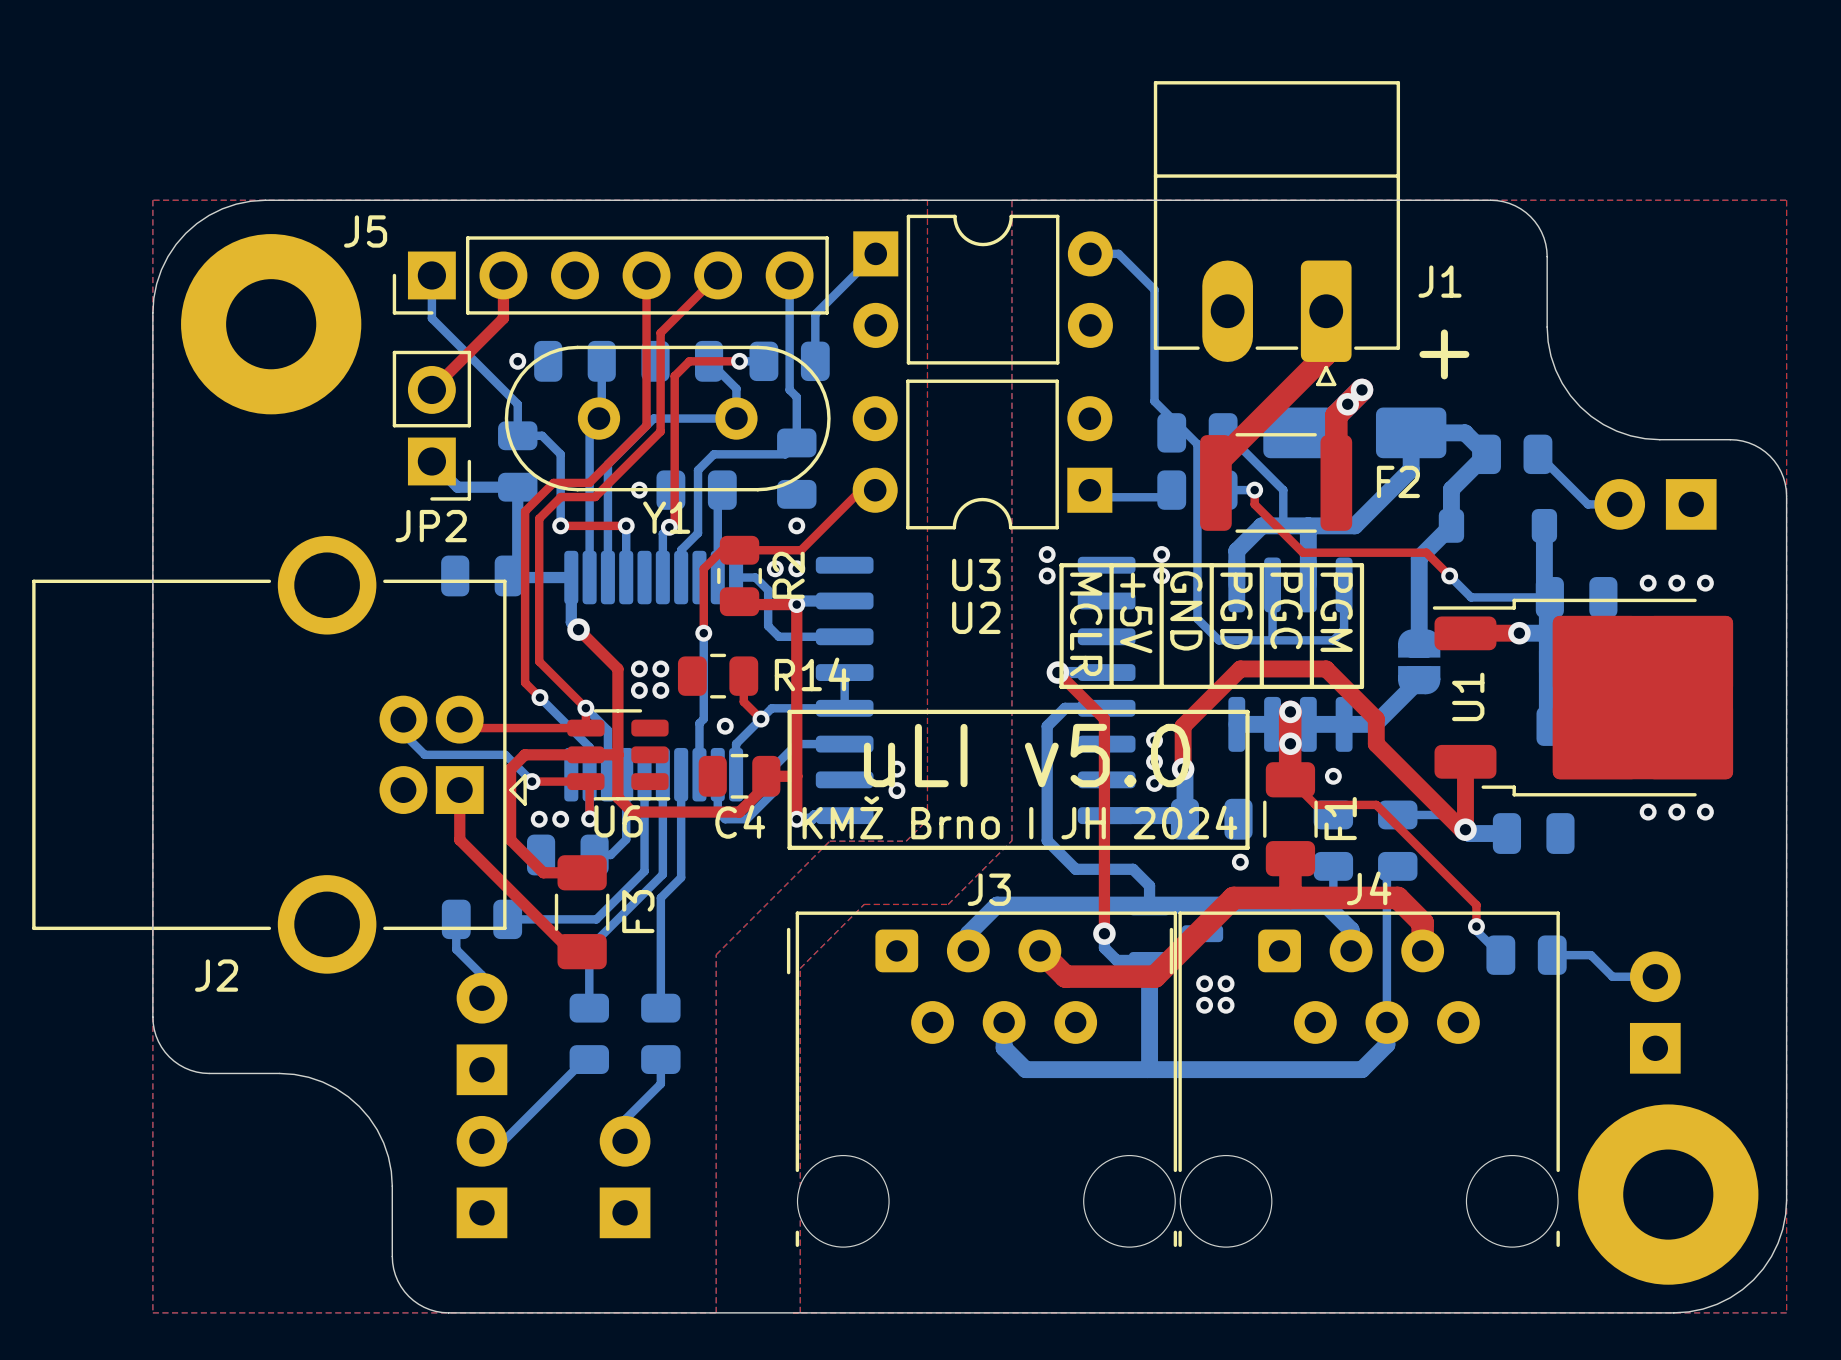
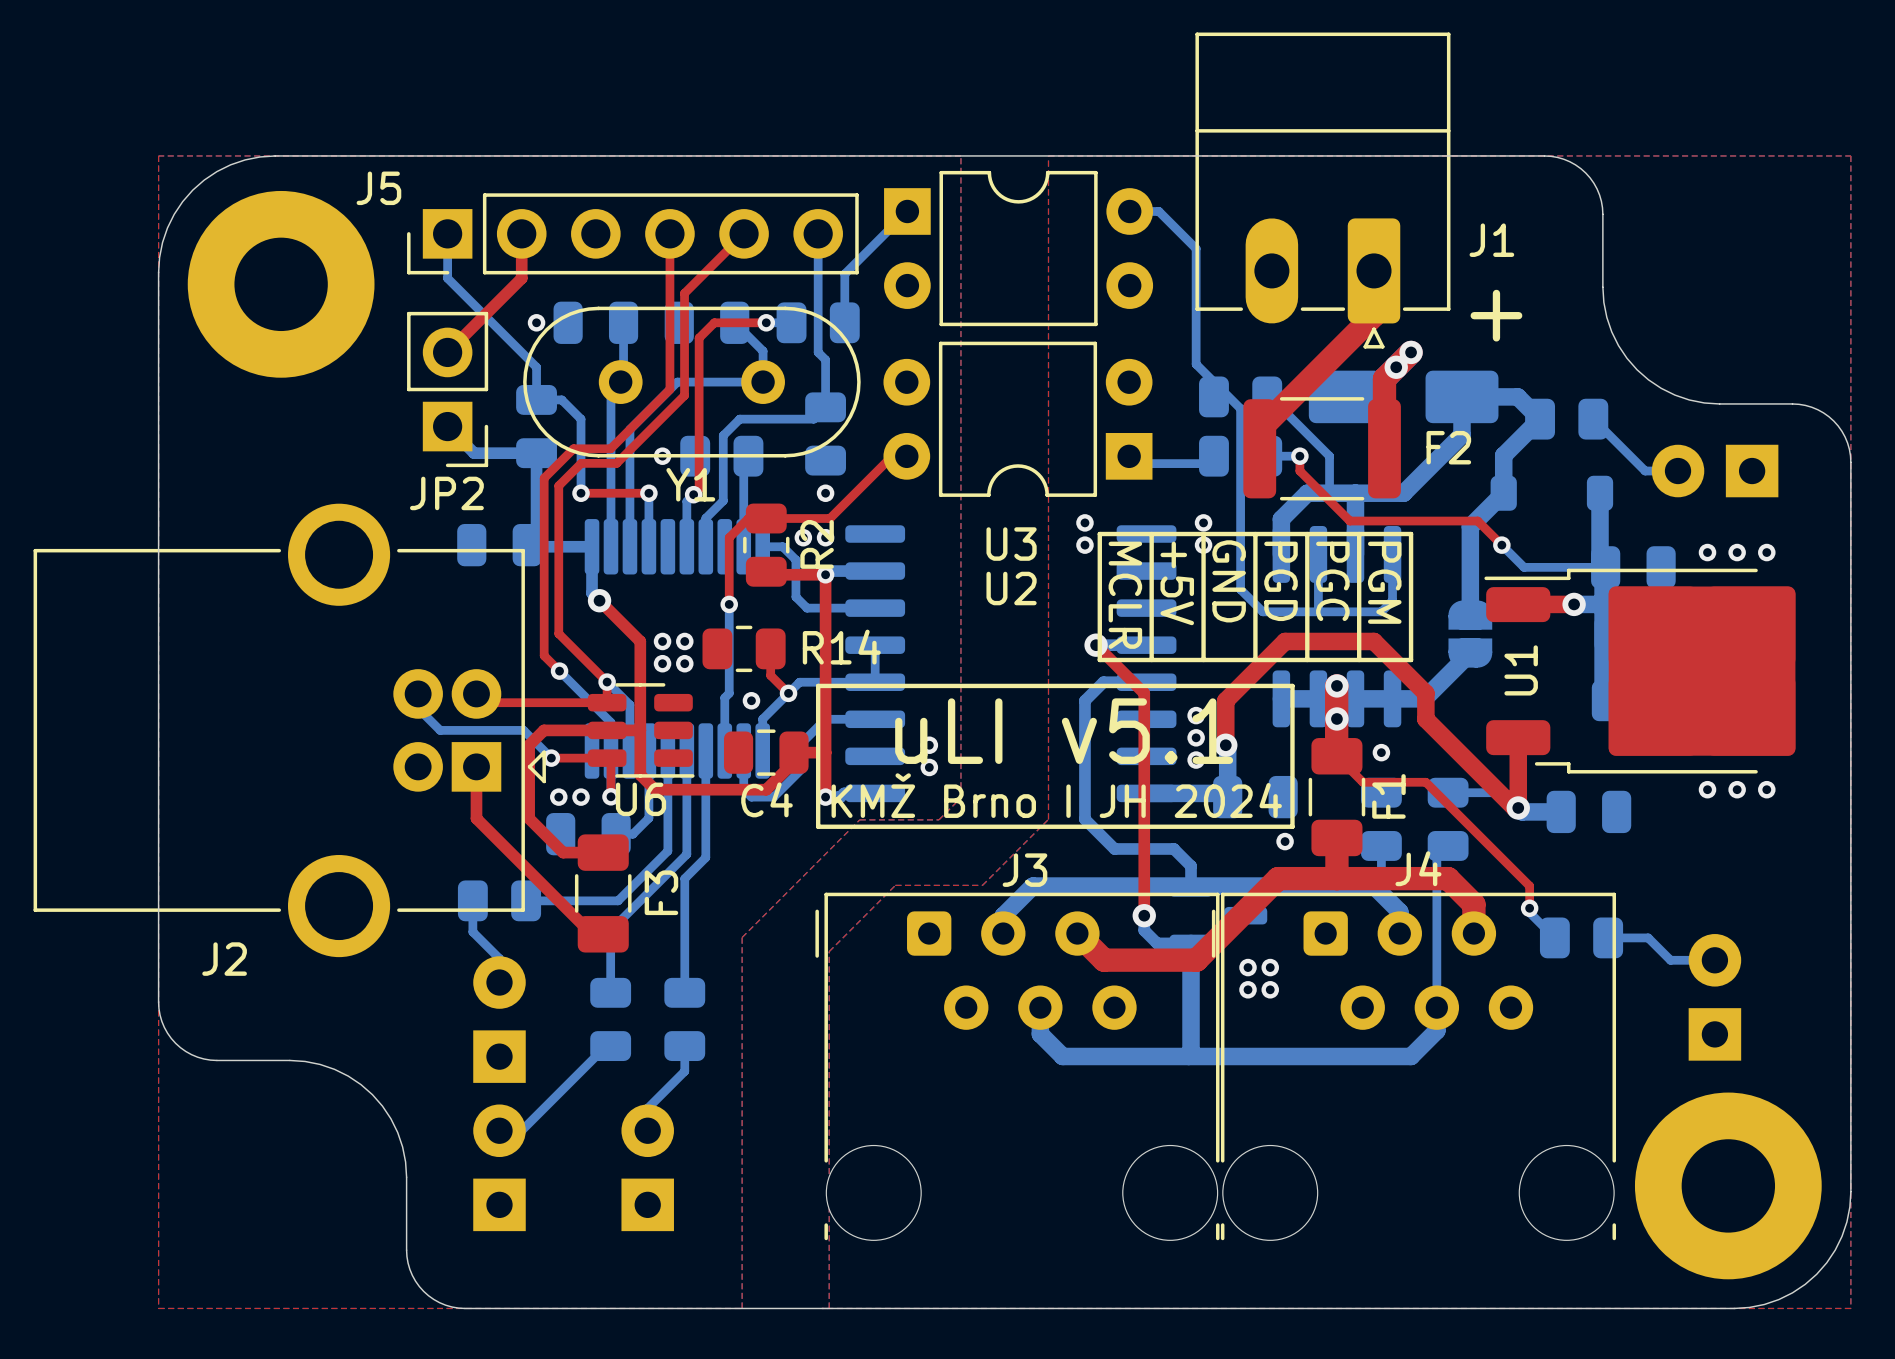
text: uLI v5.0 (1027, 755) -> uLI v5.1 (1064, 731)

